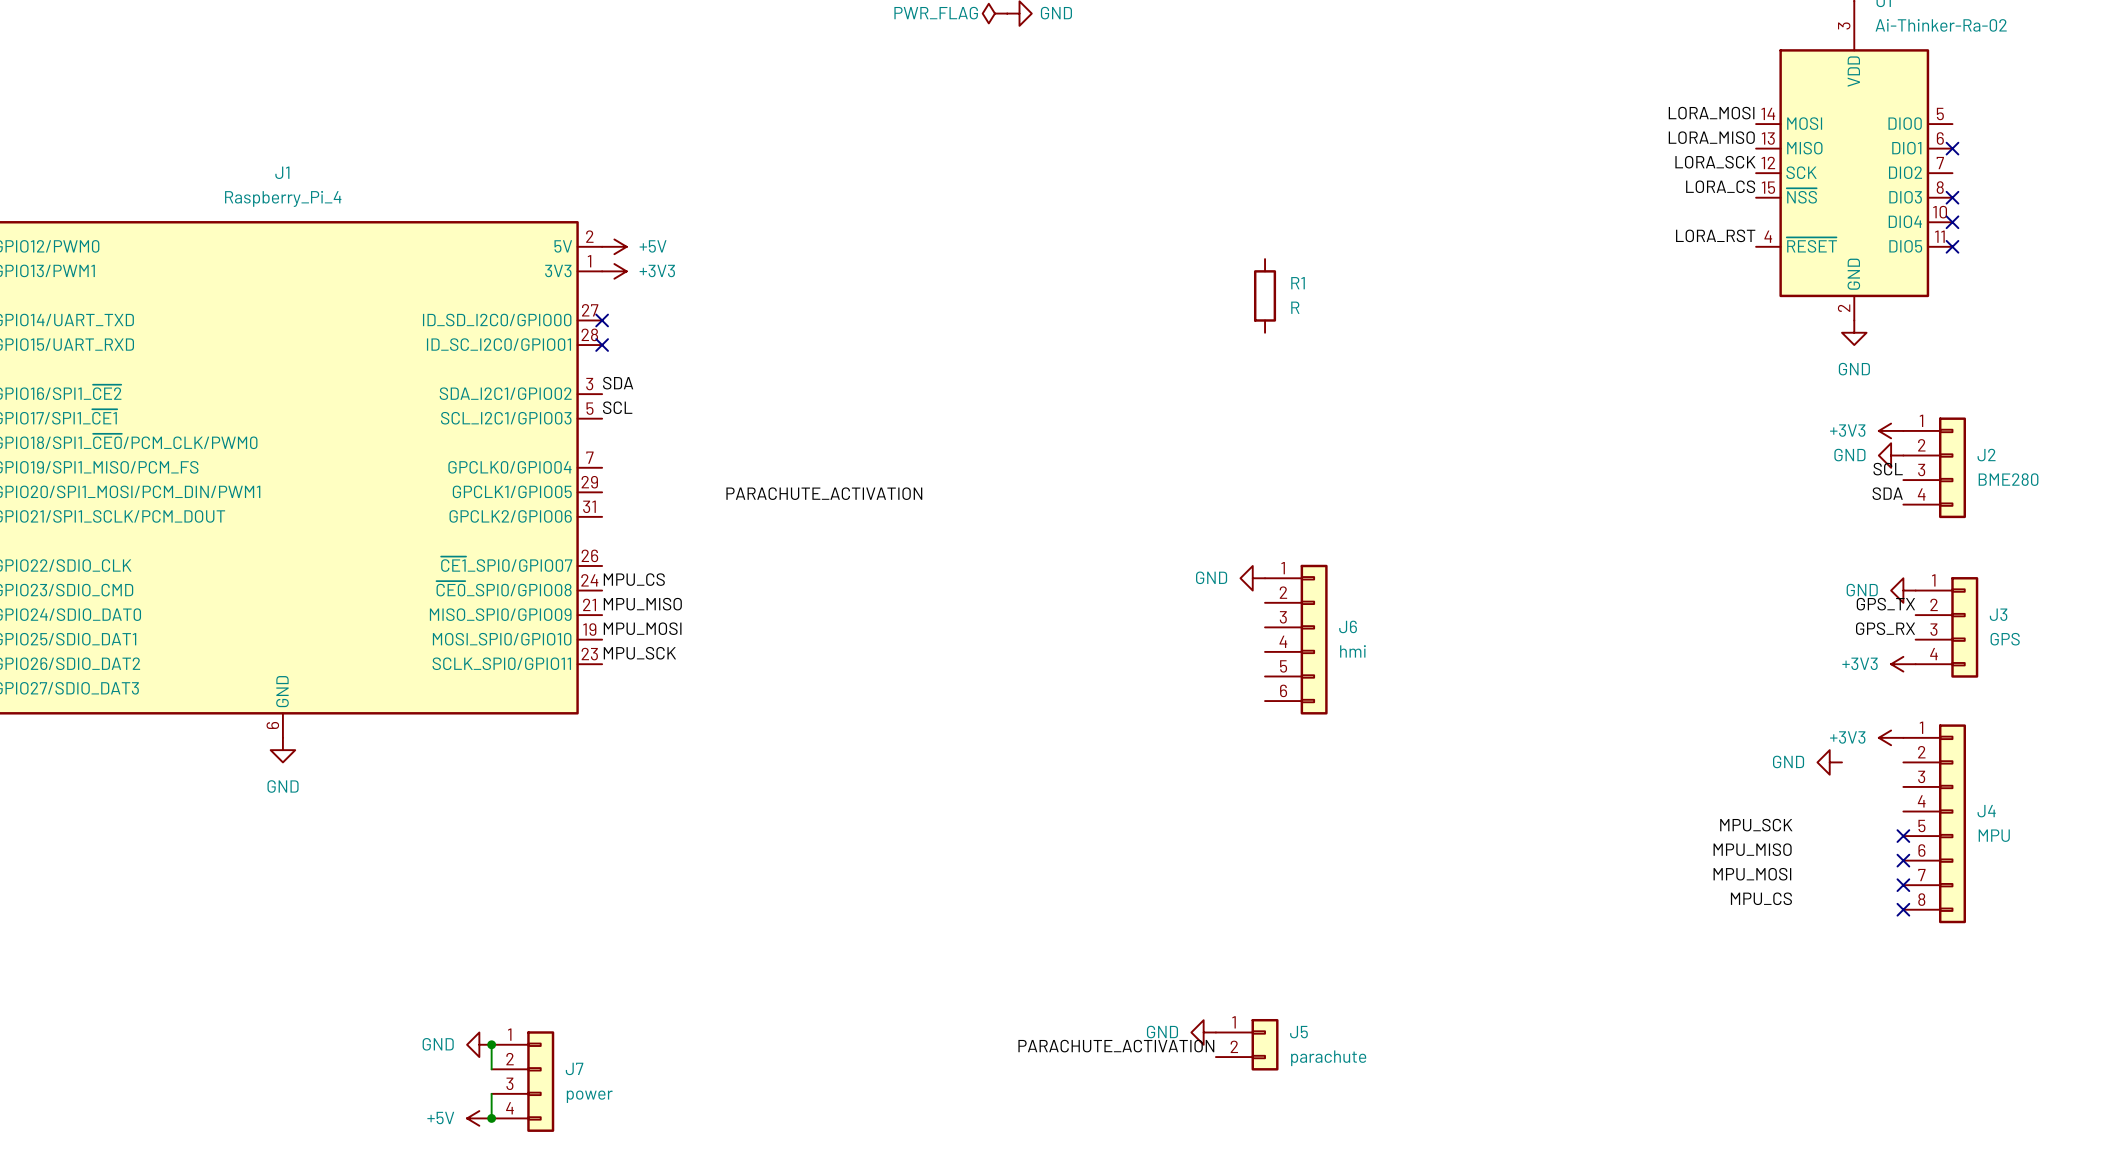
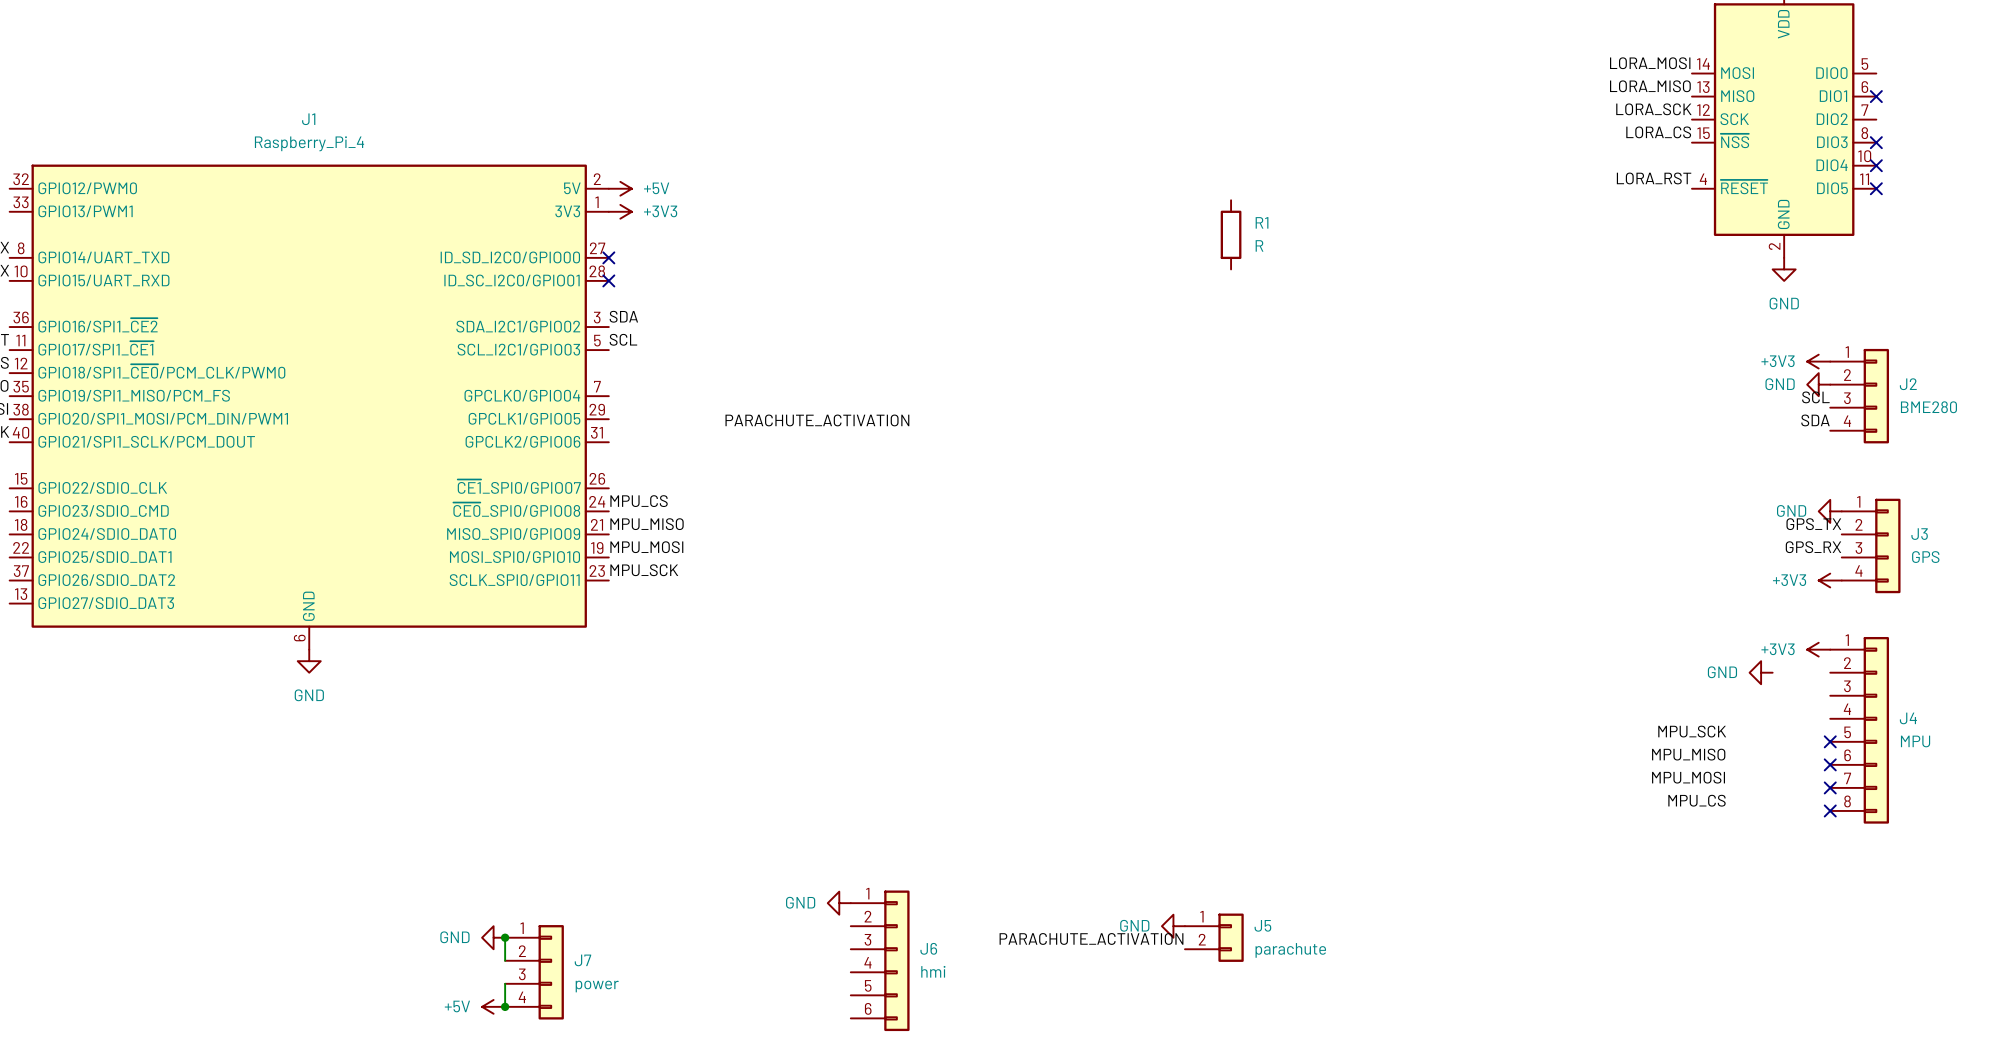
power symbol: GND (1252, 578) -> none
J6 position: (1296, 639) -> (880, 960)
power symbol: none -> GND (839, 903)

